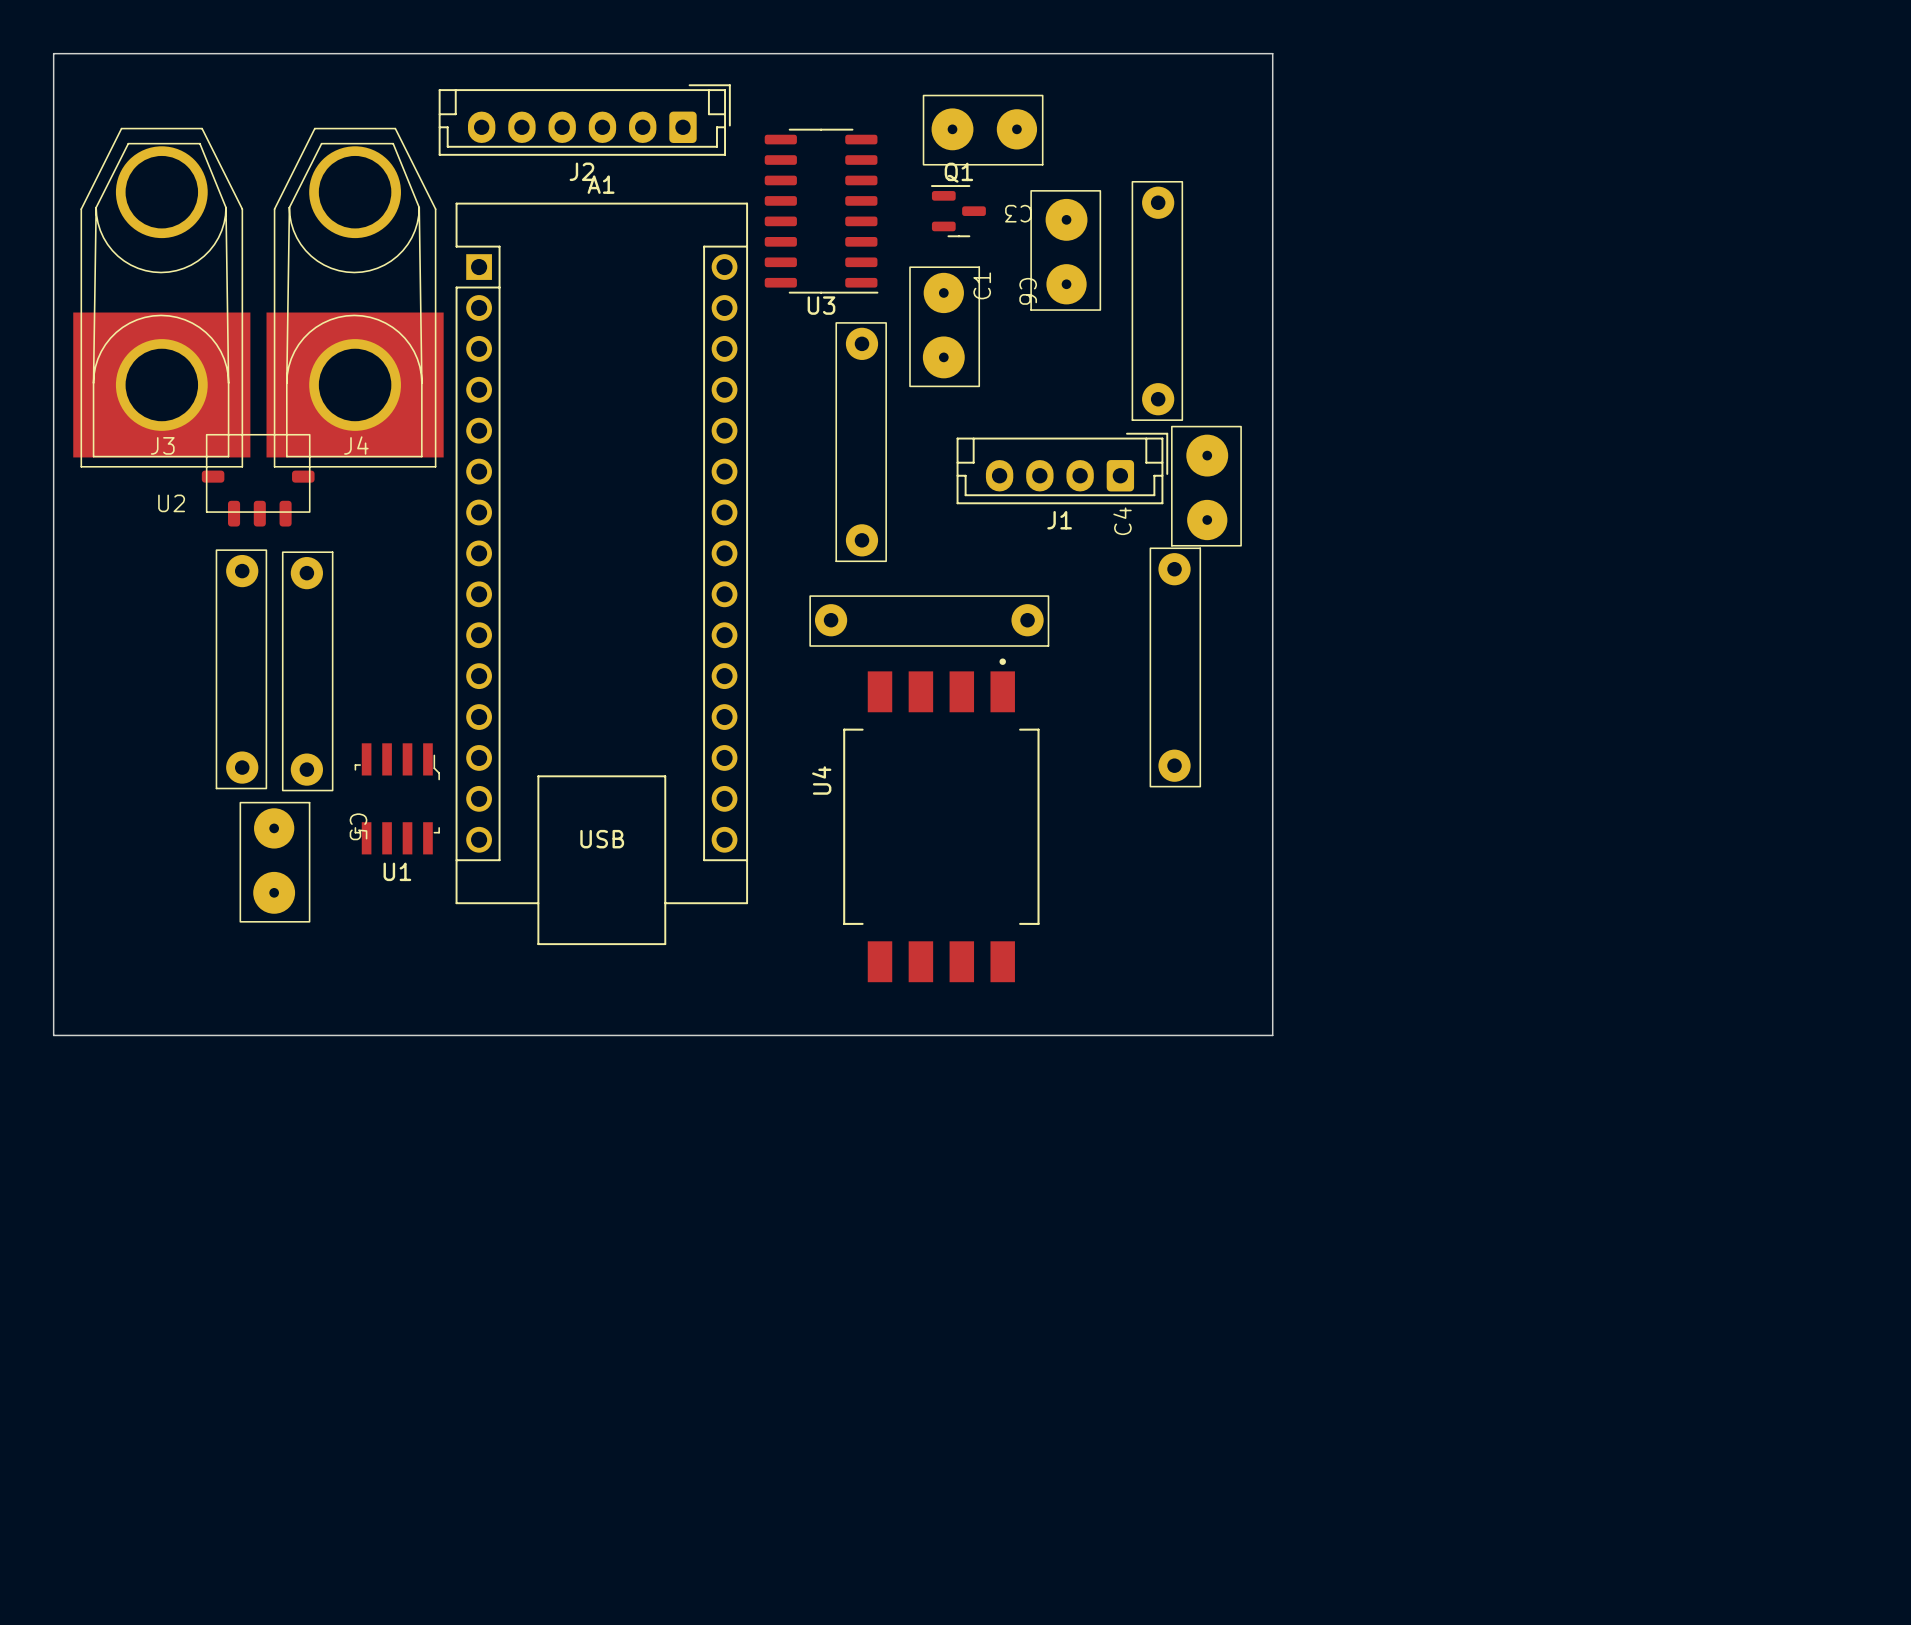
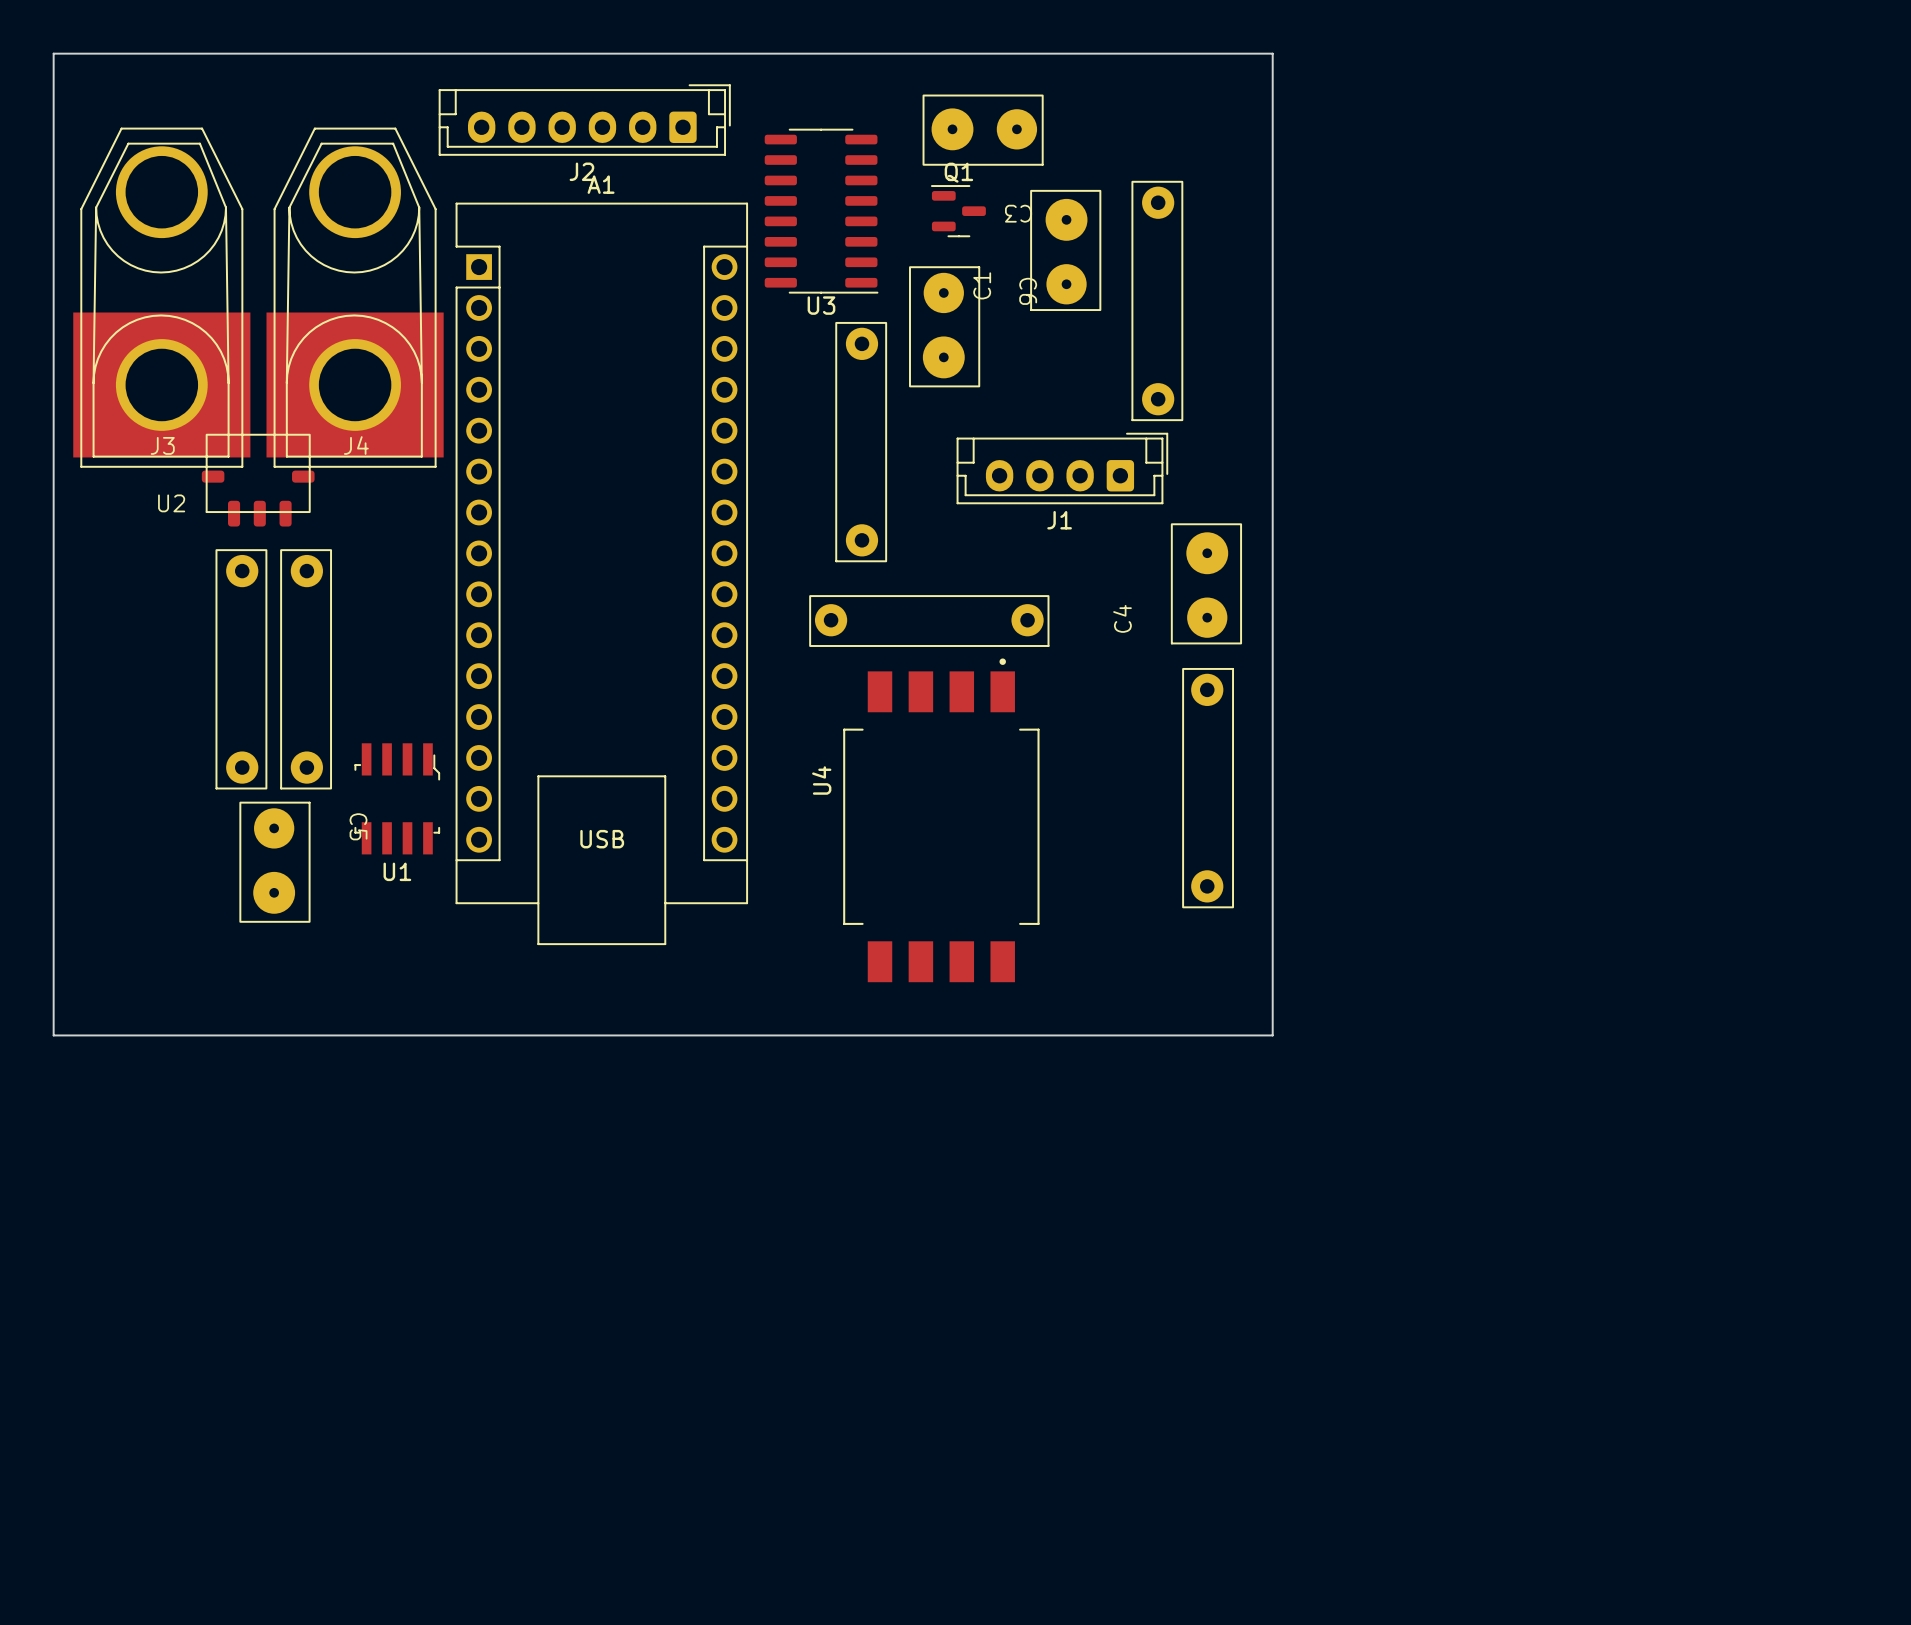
C4 position: (1206, 486) -> (1206, 583)
part position: (1175, 667) -> (1208, 788)
part rotation: 0° (307, 671) -> 180° (306, 669)

